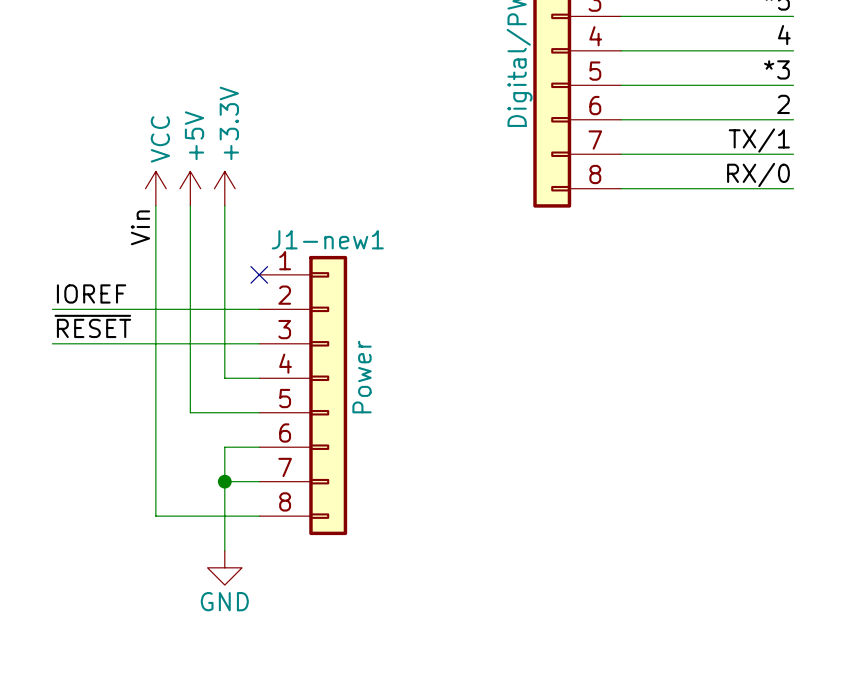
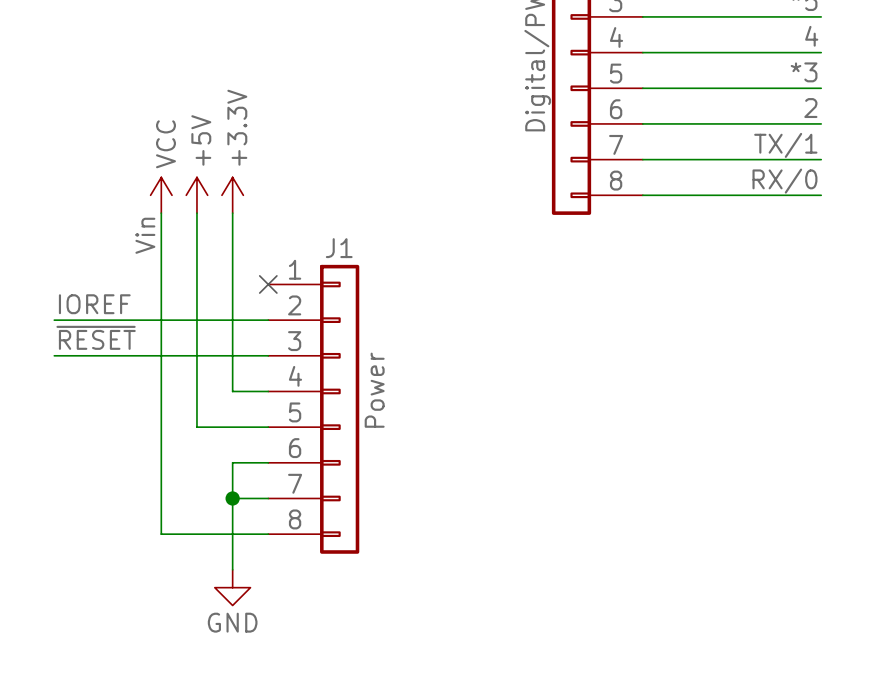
J1-new1 name: J1-new1 (327, 239) -> J1 (339, 248)

